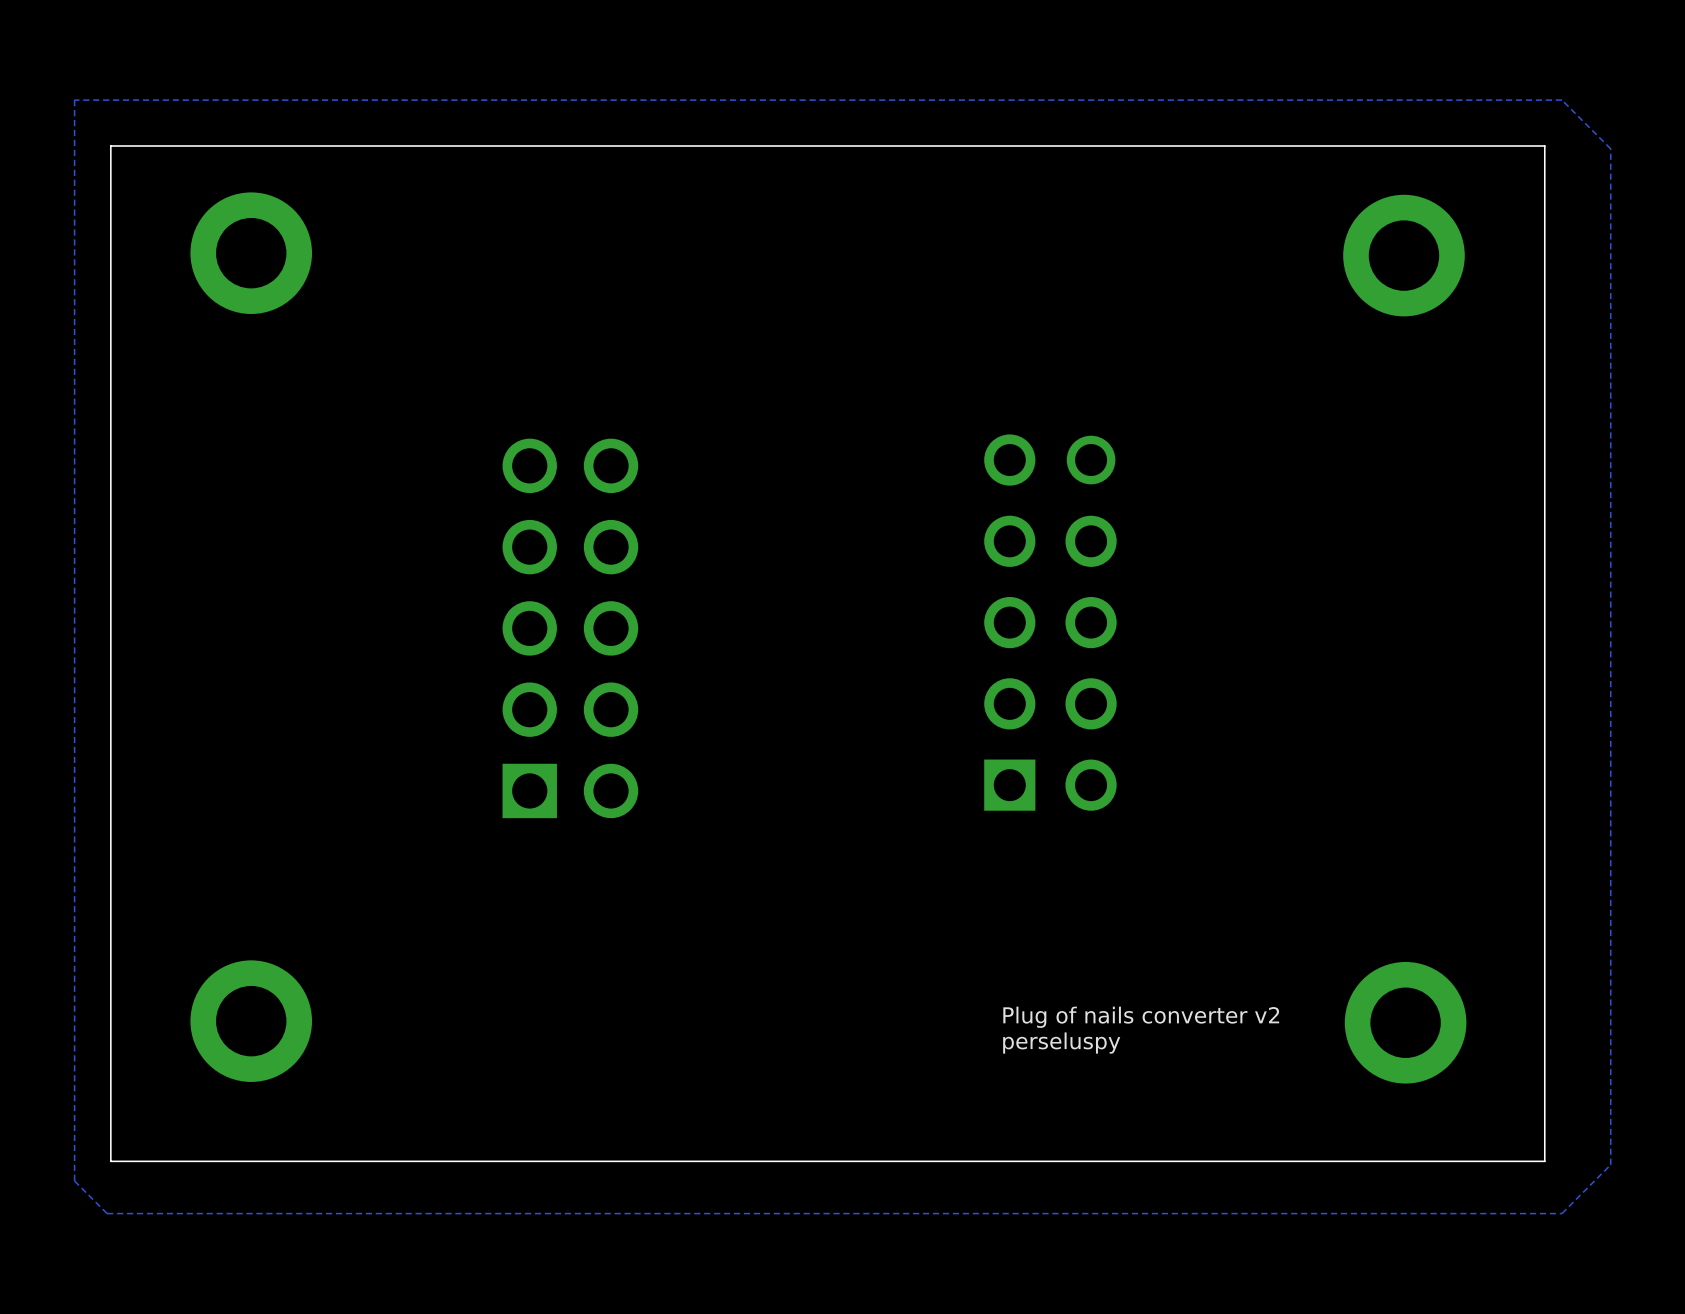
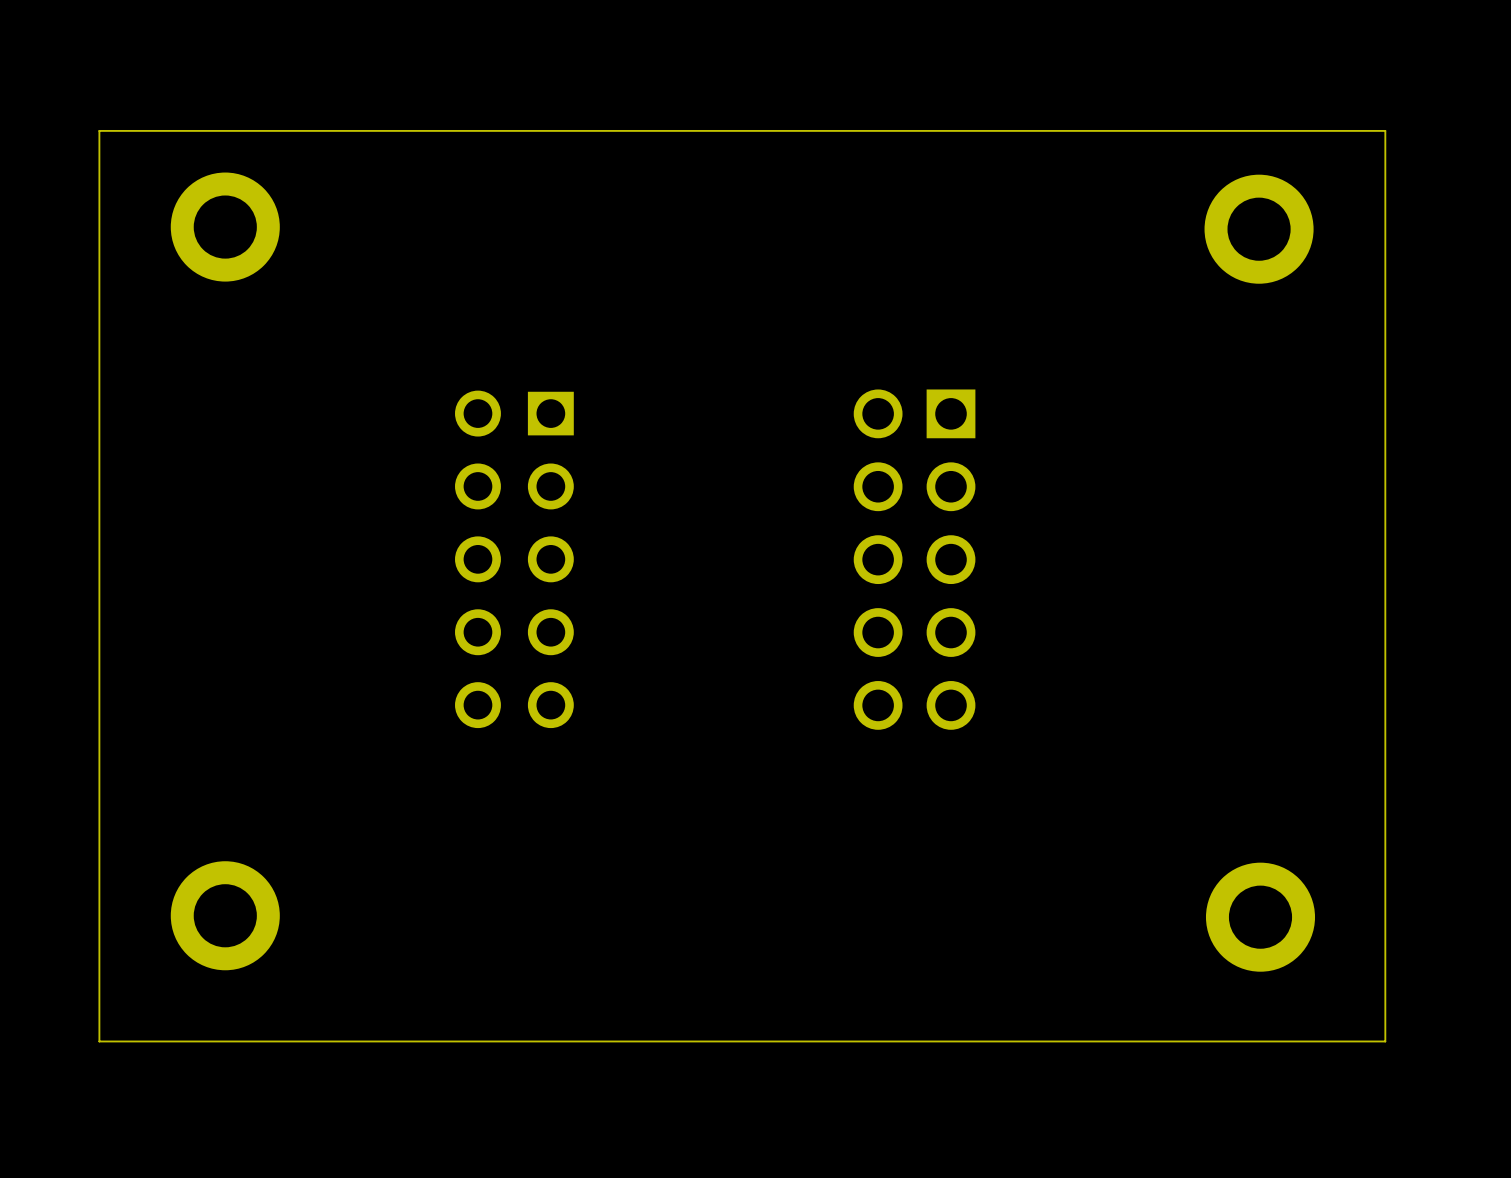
zone outline: (1561, 100) (74, 100) (74, 1181) (107, 1213) (1561, 1213) (1610, 1164) (1610, 148) (1561, 100) -> none
part footprint: [984, 434, 1117, 811] -> [853, 389, 976, 730]
part footprint: [502, 438, 639, 819] -> [455, 390, 574, 729]
text: Plug of nails converter v2 (1141, 1017) -> none
text: perseluspy (1061, 1043) -> none

